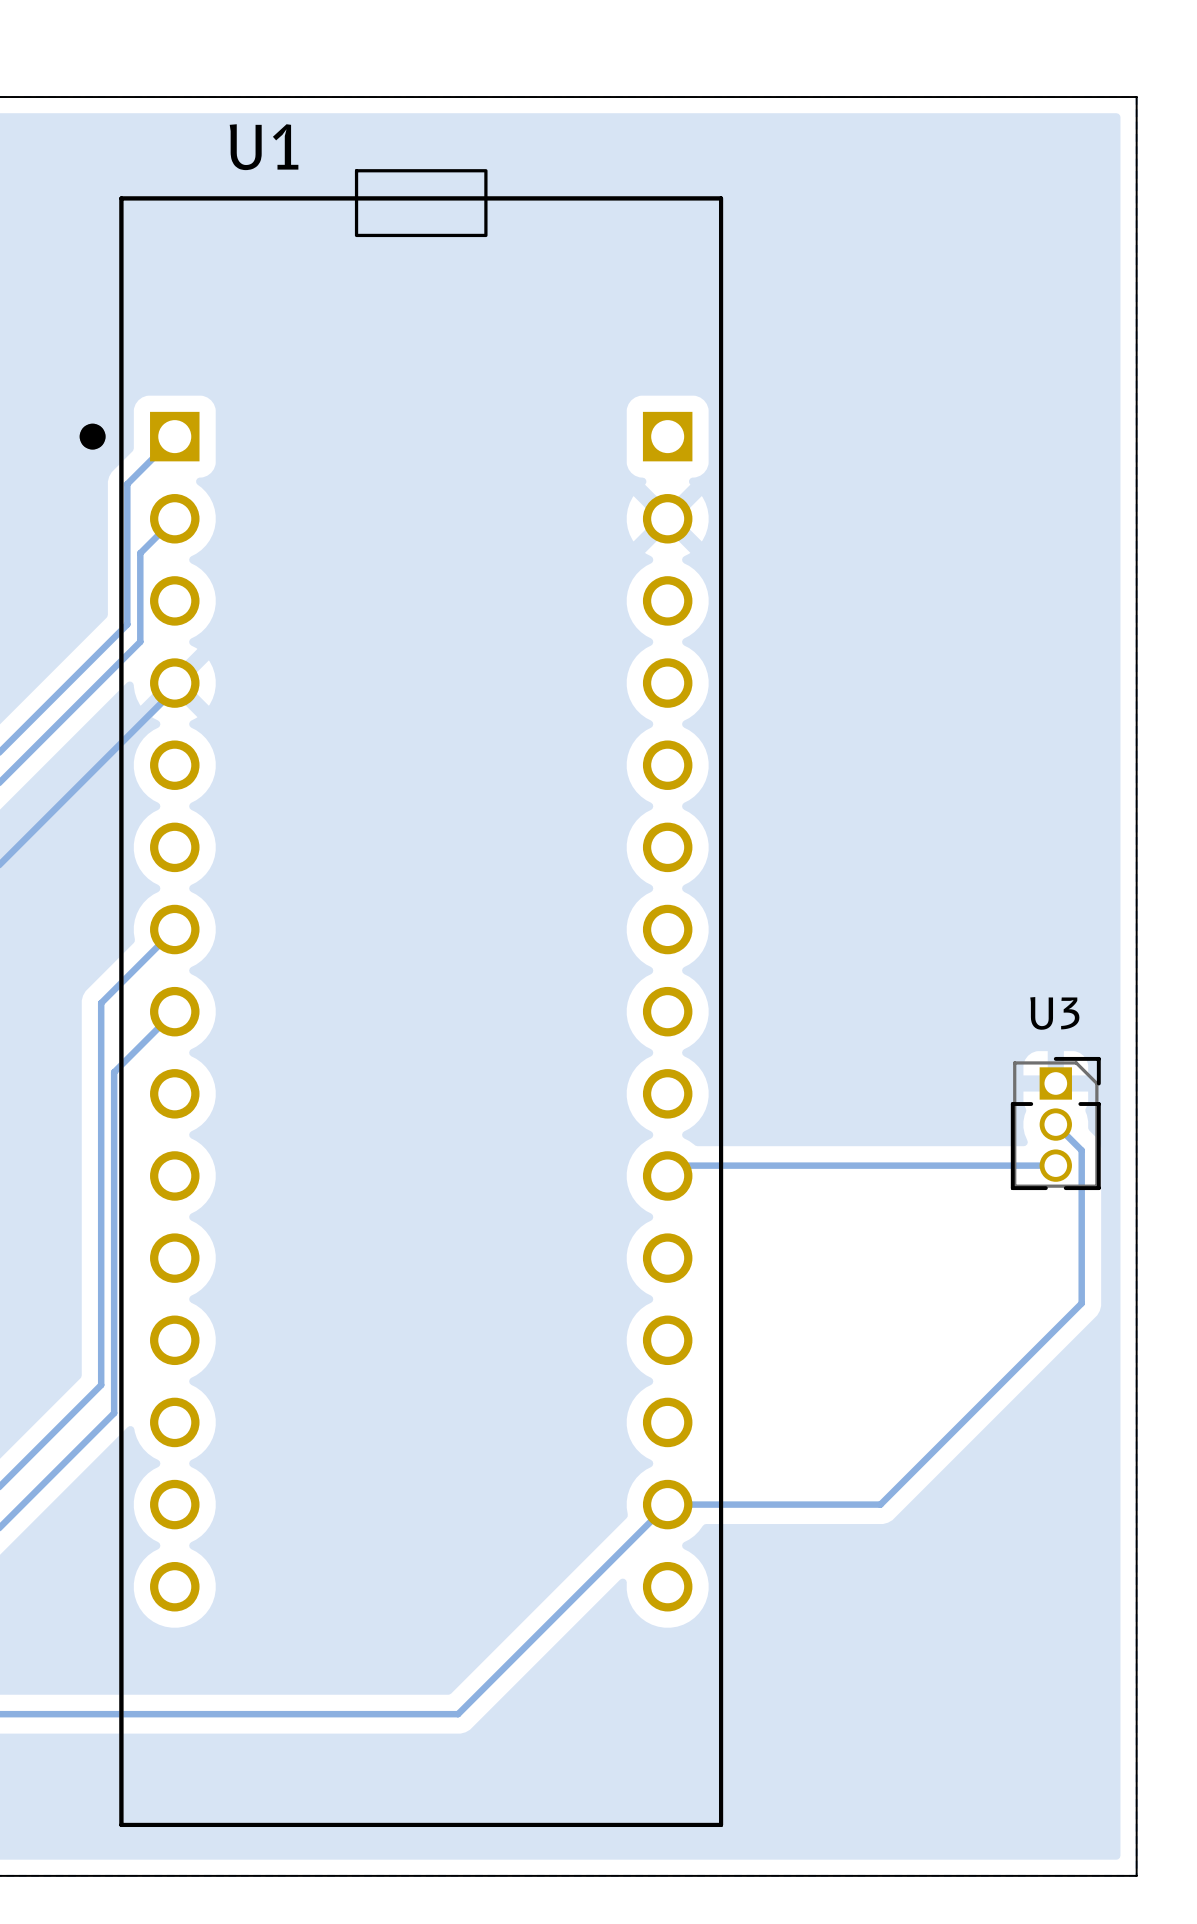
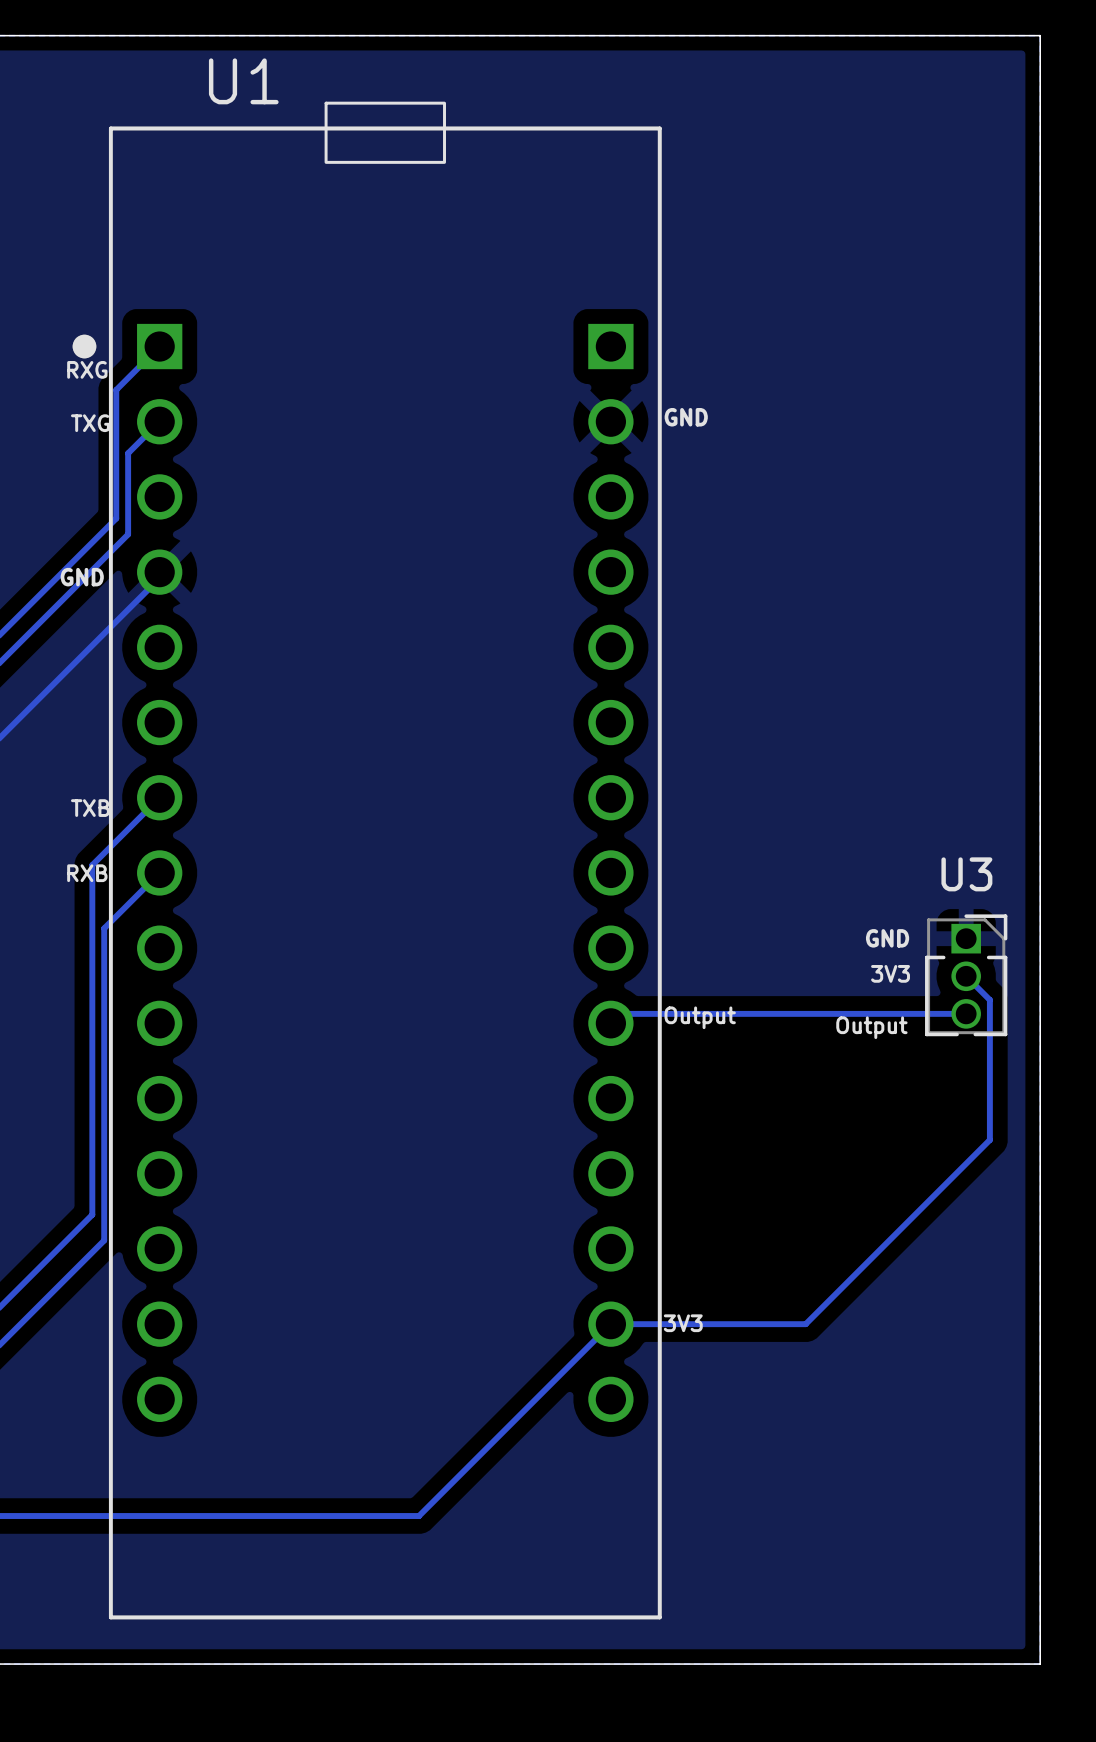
text: none -> RXG (87, 369)
text: none -> GND (686, 417)
text: none -> TXG (90, 423)
text: none -> GND (82, 577)
text: none -> TXB (90, 808)
text: none -> RXB (87, 873)
text: none -> GND (887, 938)
text: none -> 3V3 (890, 973)
text: none -> Output (700, 1017)
text: none -> Output (871, 1027)
text: none -> 3V3 (683, 1323)

